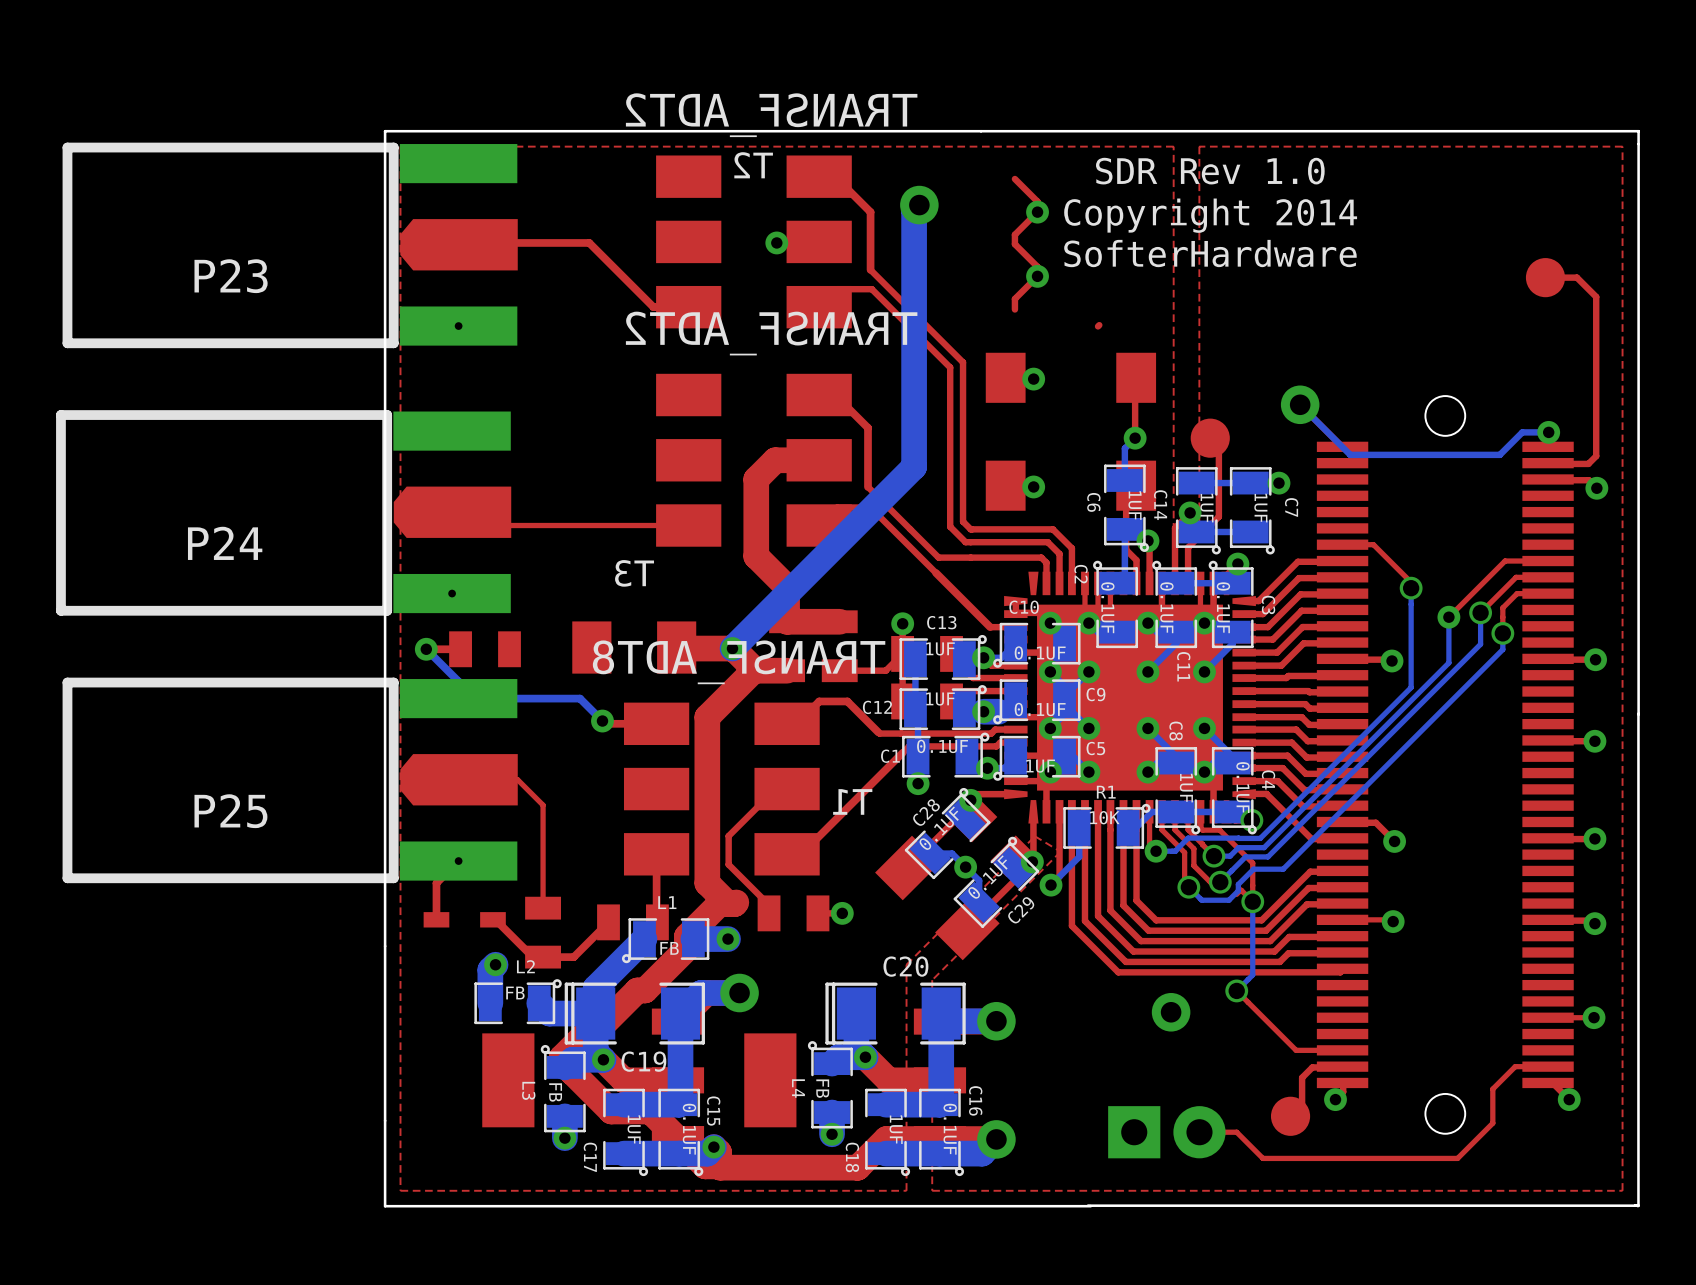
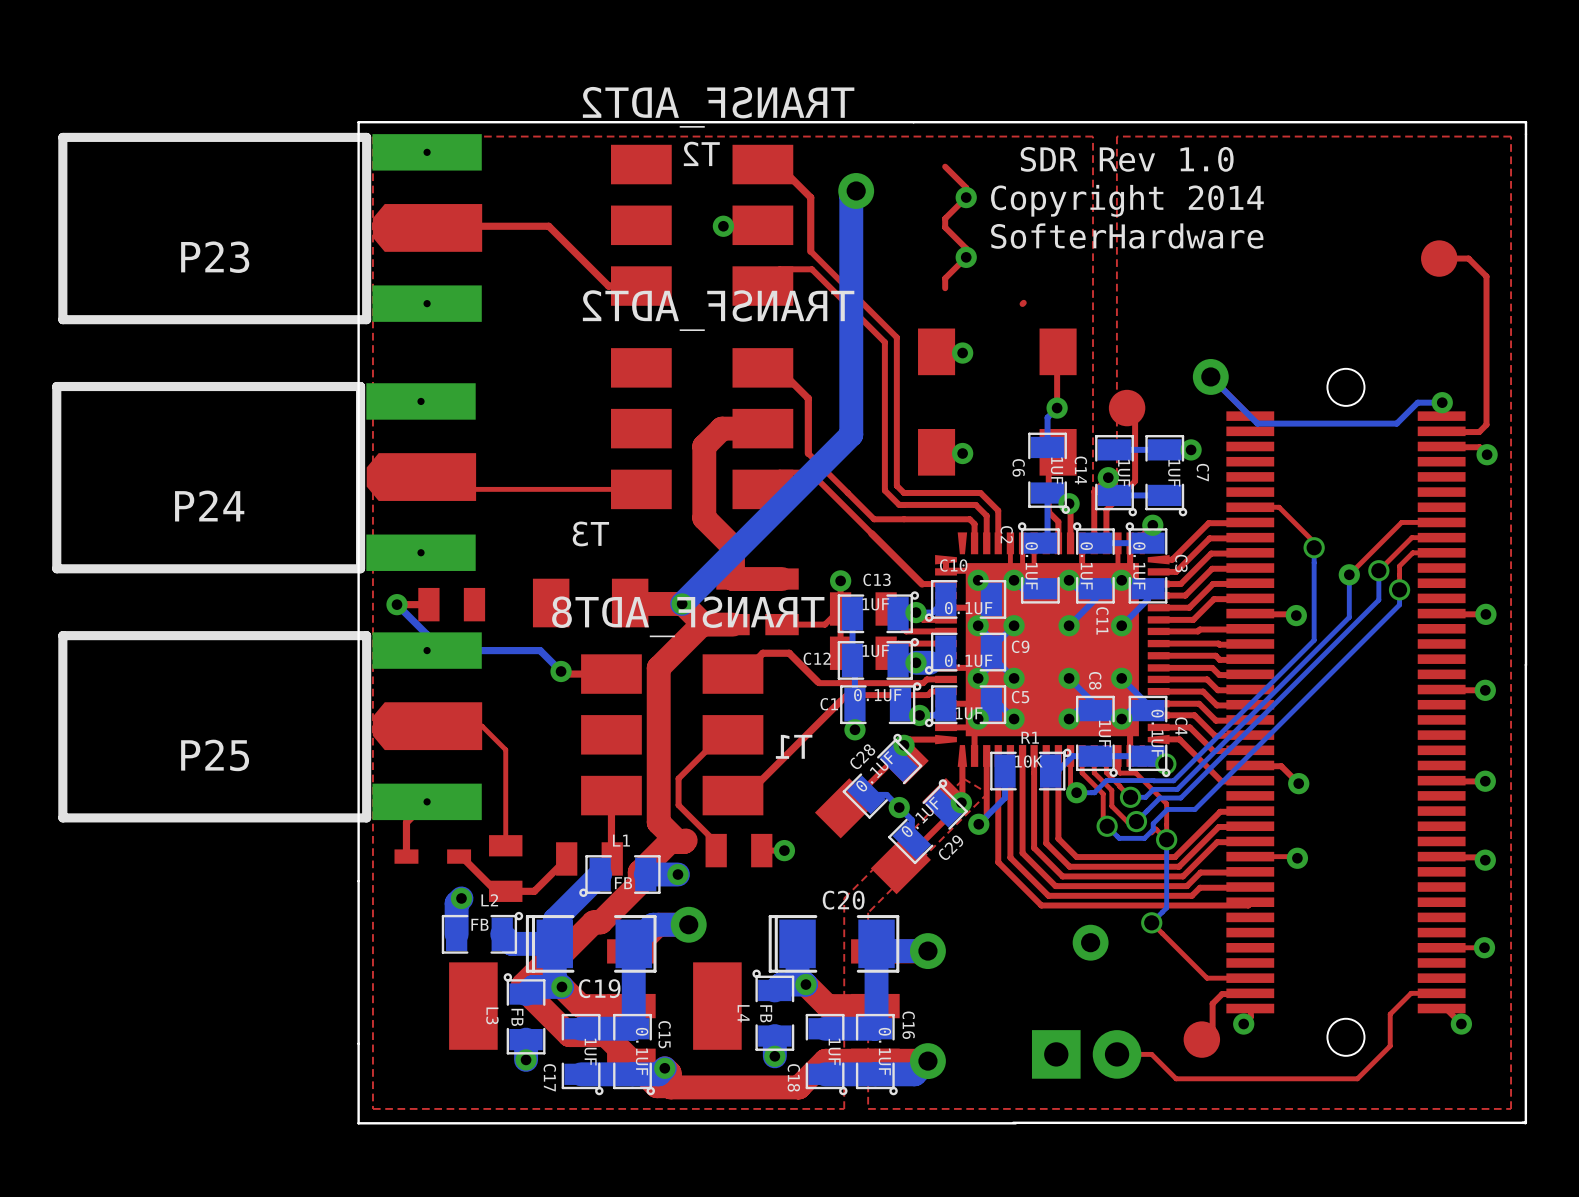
P23 footprint: [62, 142, 518, 349] -> [58, 132, 483, 325]
P24 footprint: [56, 410, 512, 616] -> [52, 381, 477, 574]
P25 footprint: [62, 677, 518, 884] -> [58, 631, 483, 823]

